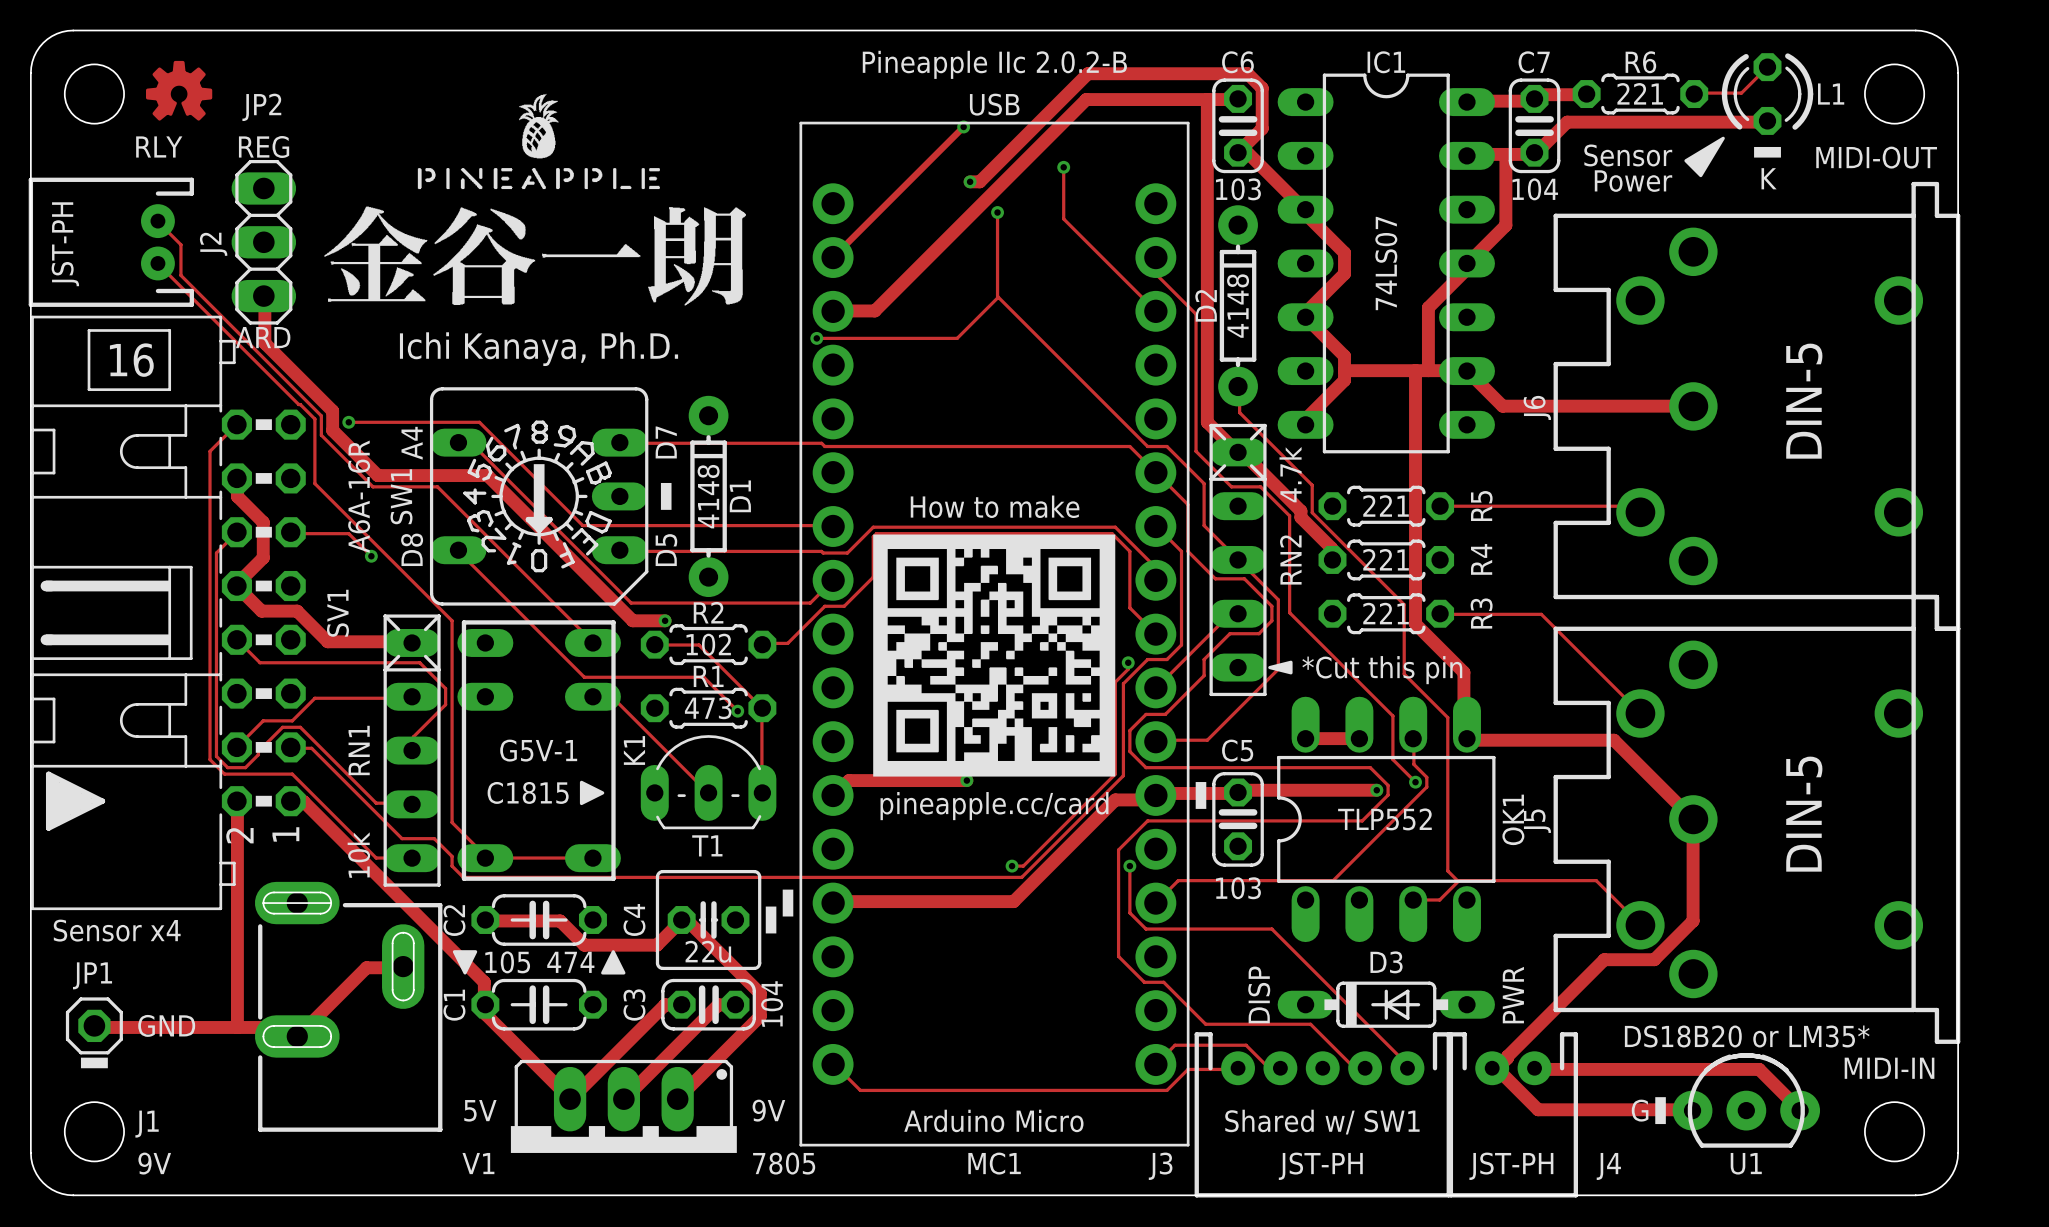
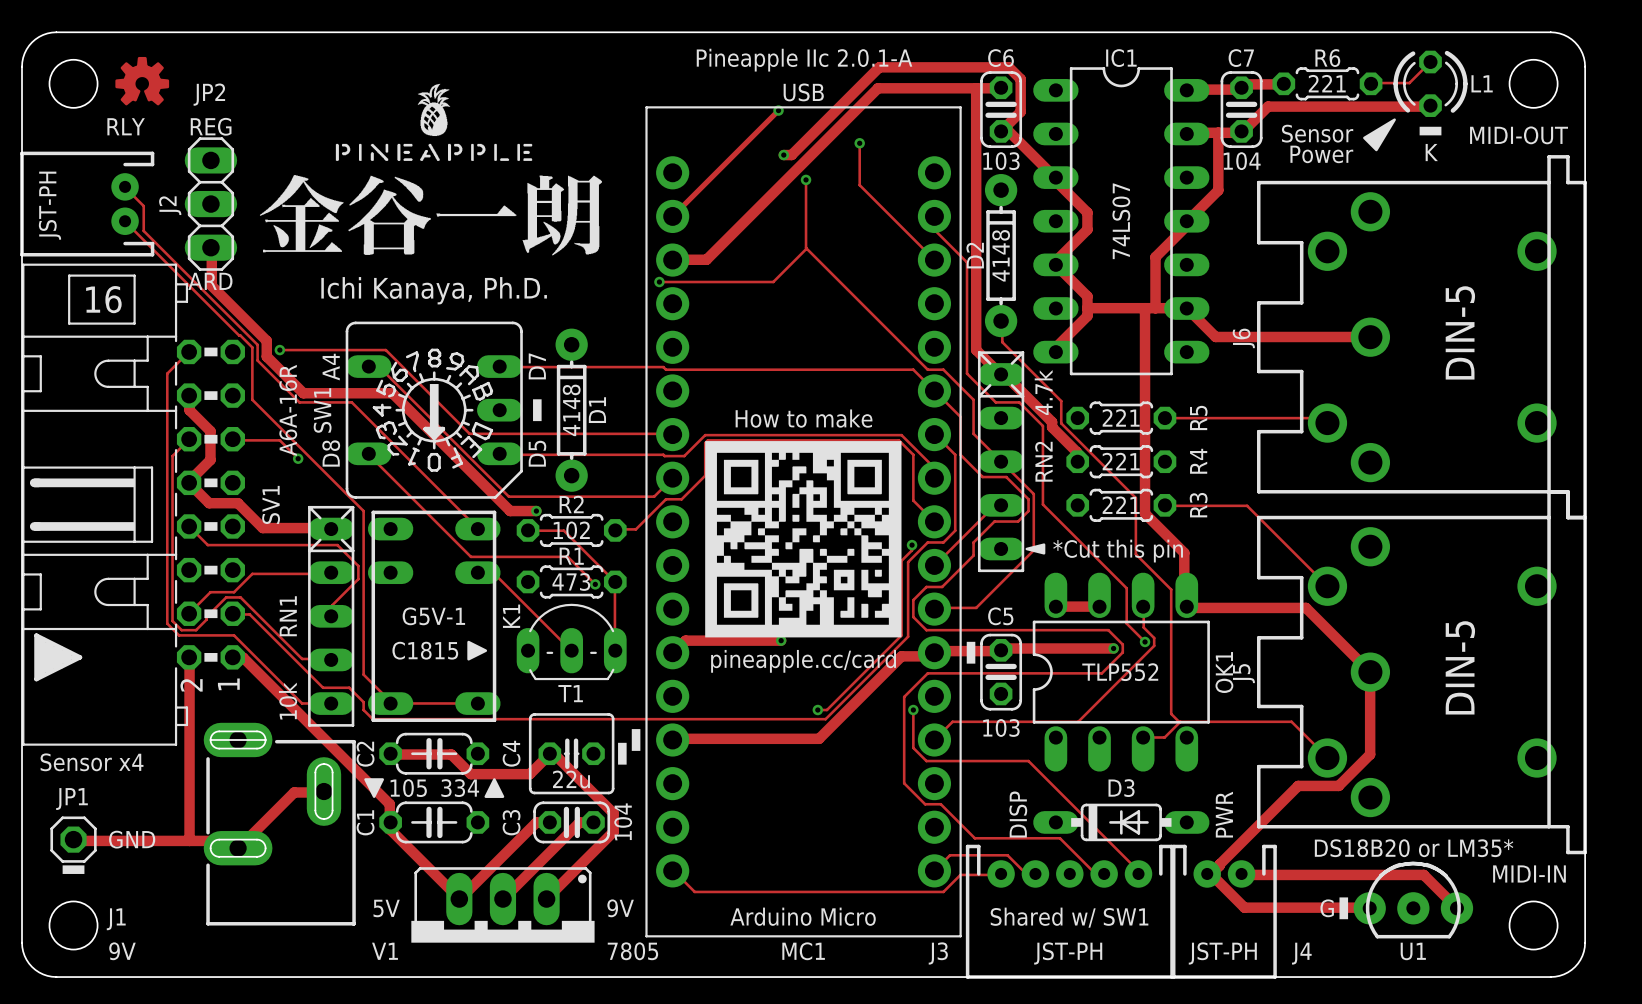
text: Pineapple IIc 2.0.2-B (994, 64) -> Pineapple IIc 2.0.1-A (804, 60)
text: 474 (570, 962) -> 334 (460, 788)

